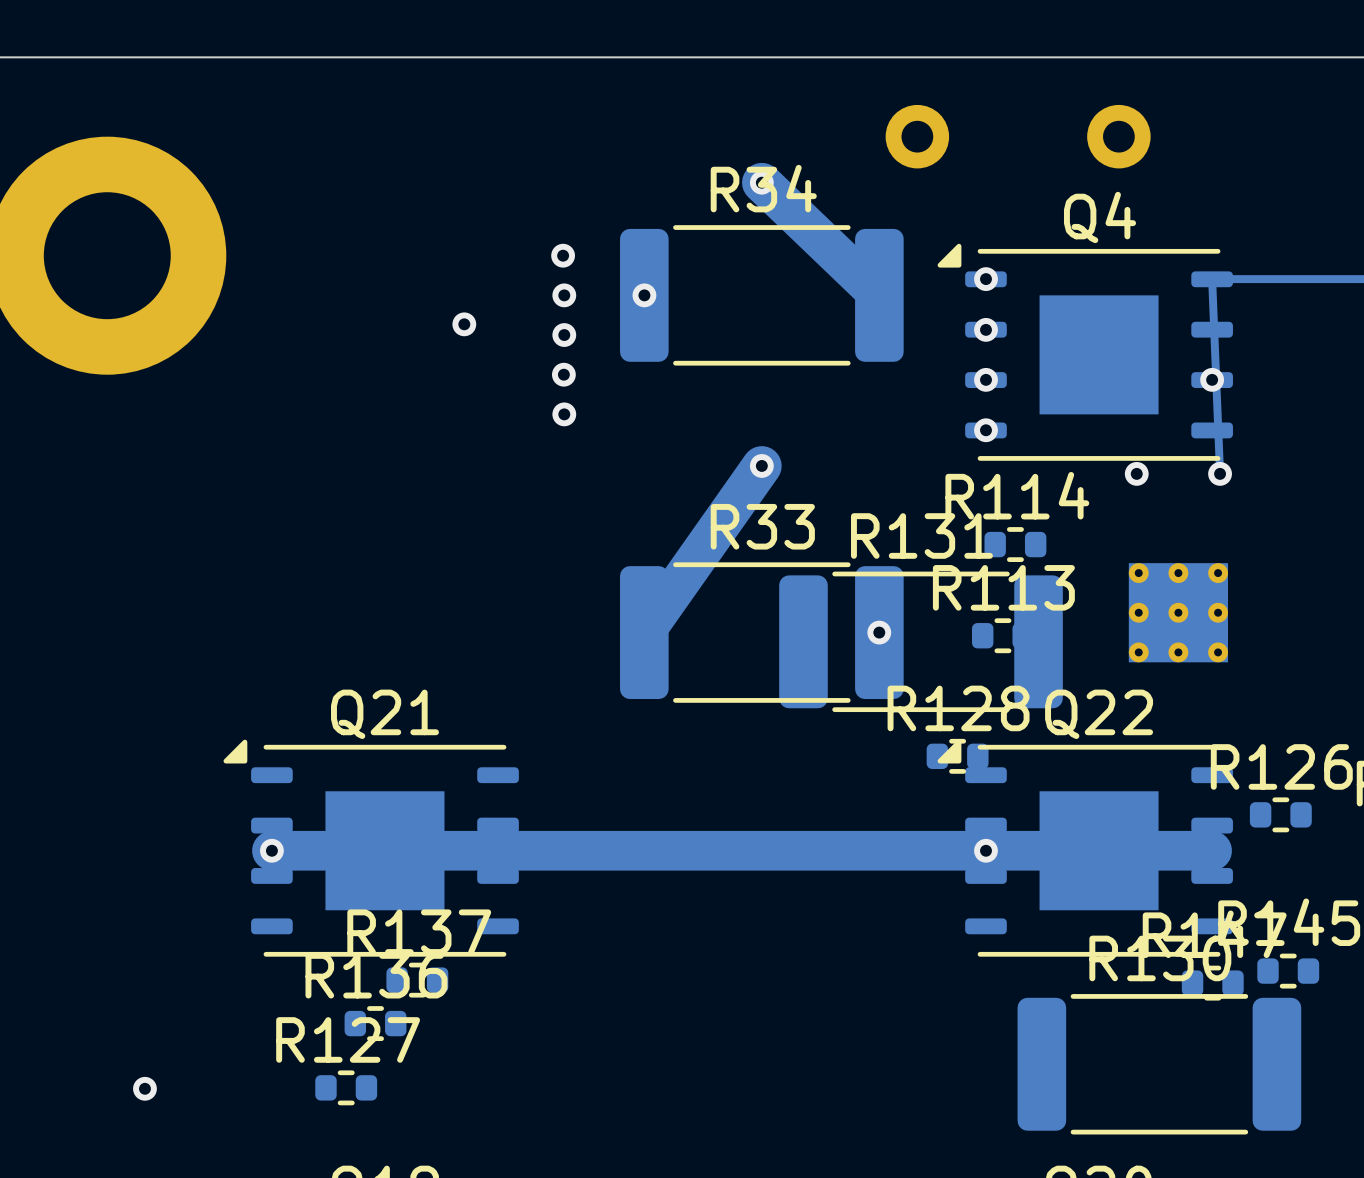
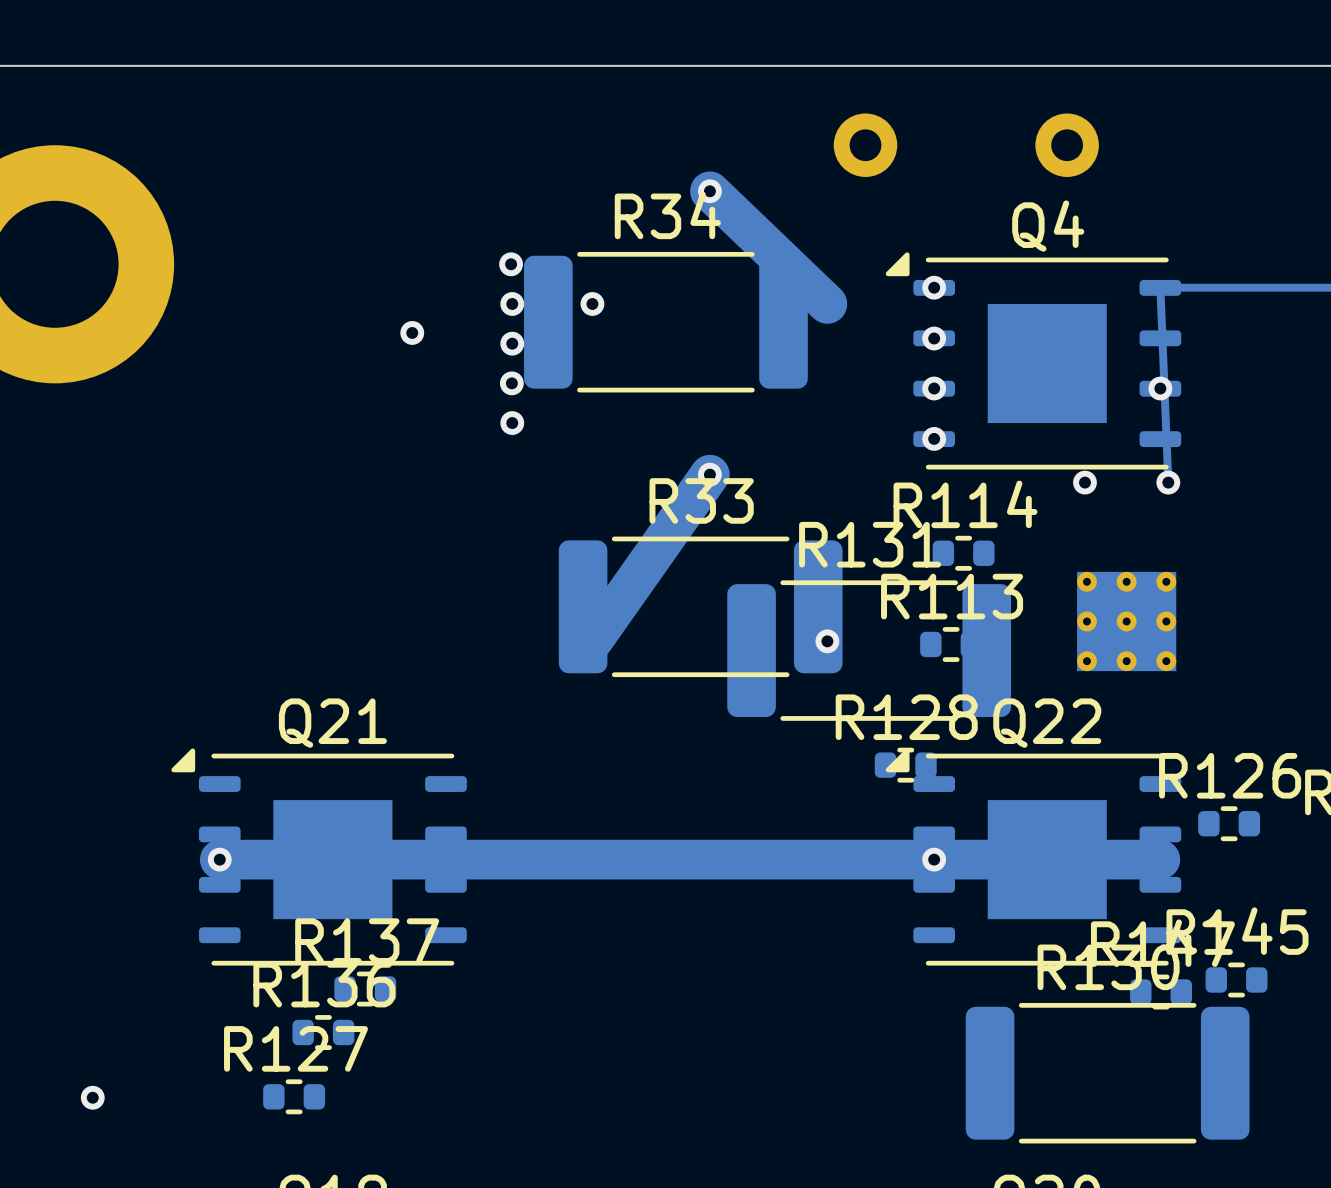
R34 position: (761, 295) -> (665, 322)
R33 position: (761, 632) -> (700, 606)

